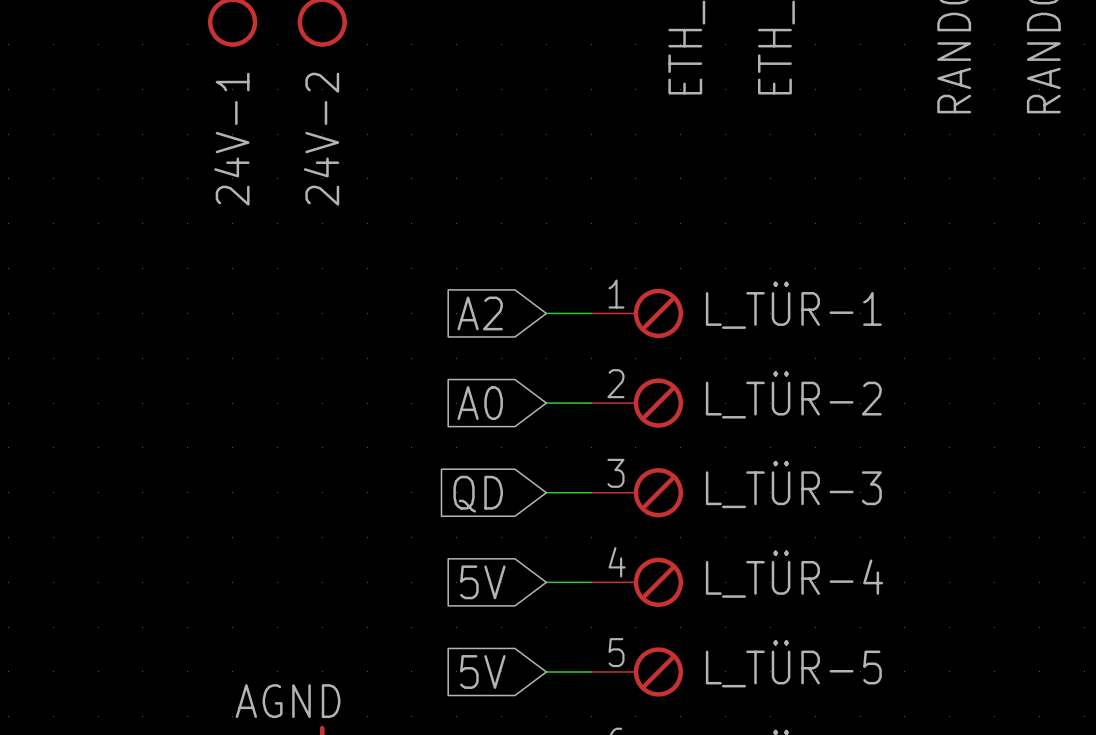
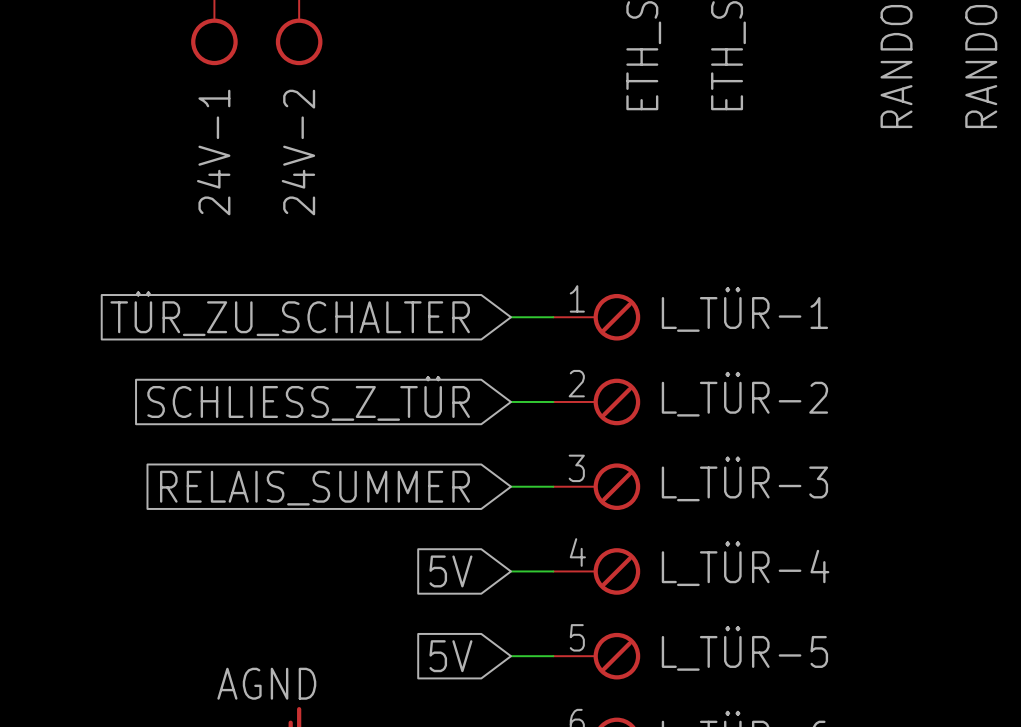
global label: A2 (480, 313) -> TÜR_ZU_SCHALTER (290, 313)
global label: A0 (480, 403) -> SCHLIESS_Z_TÜR (308, 398)
global label: QD (478, 494) -> RELAIS_SUMMER (314, 488)

